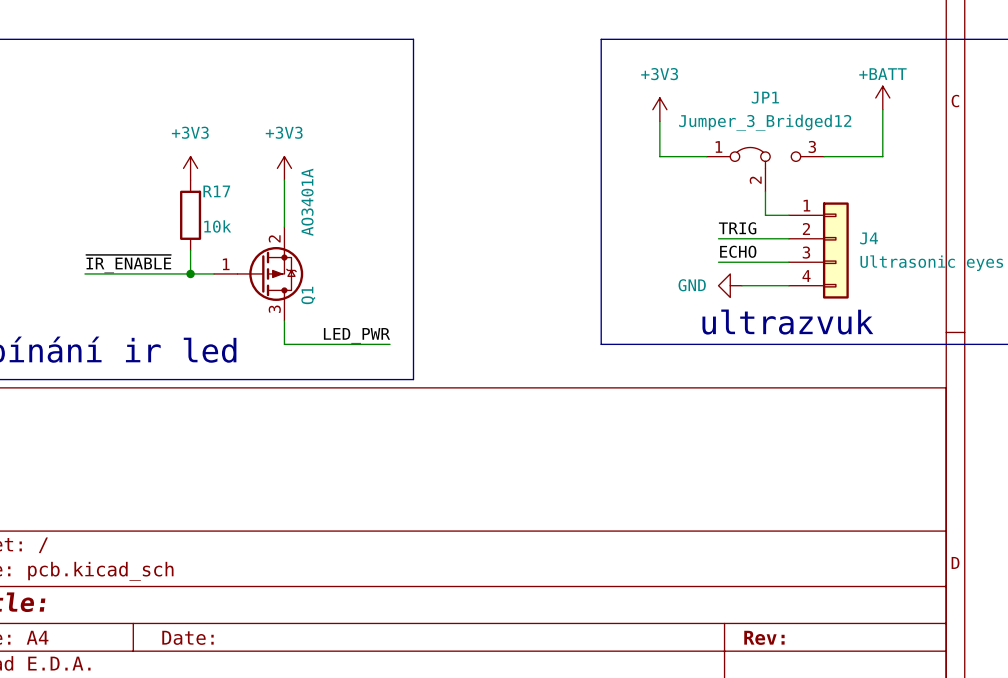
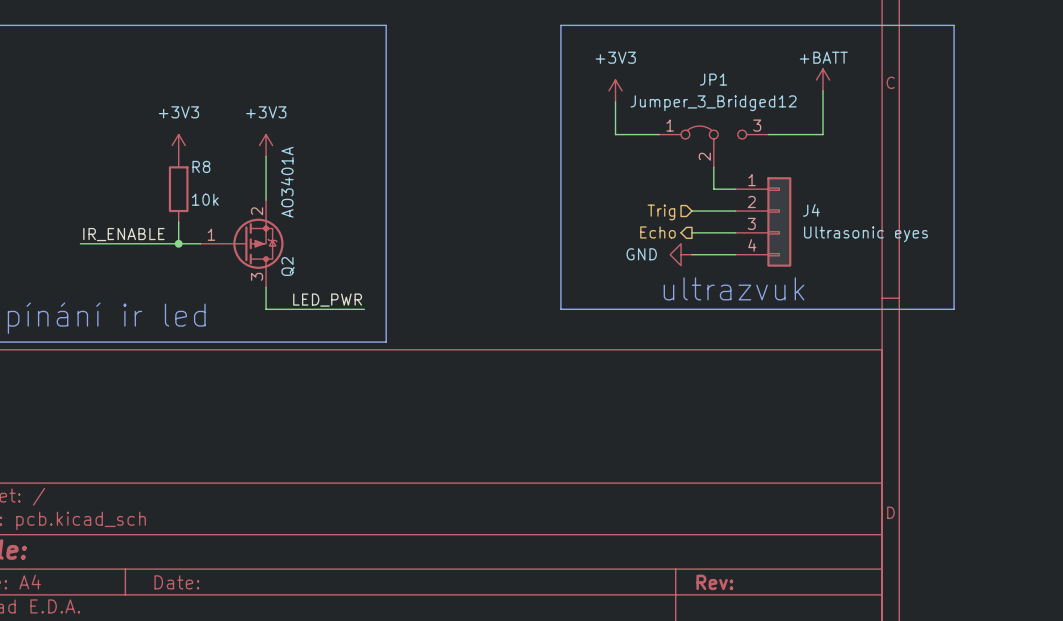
R17 name: R17 (216, 191) -> R8 (201, 166)
label: TRIG (737, 228) -> none
wire: (718, 238) (742, 238) -> none
hierarchical label: none -> Trig (661, 212)
label: ECHO (738, 251) -> none
hierarchical label: none -> Echo (657, 232)
wire: (718, 262) (742, 262) -> none
label: ~{IR_ENABLE} (128, 264) -> IR_ENABLE (123, 234)
Q1 name: Q1 (308, 295) -> Q2 (288, 266)

